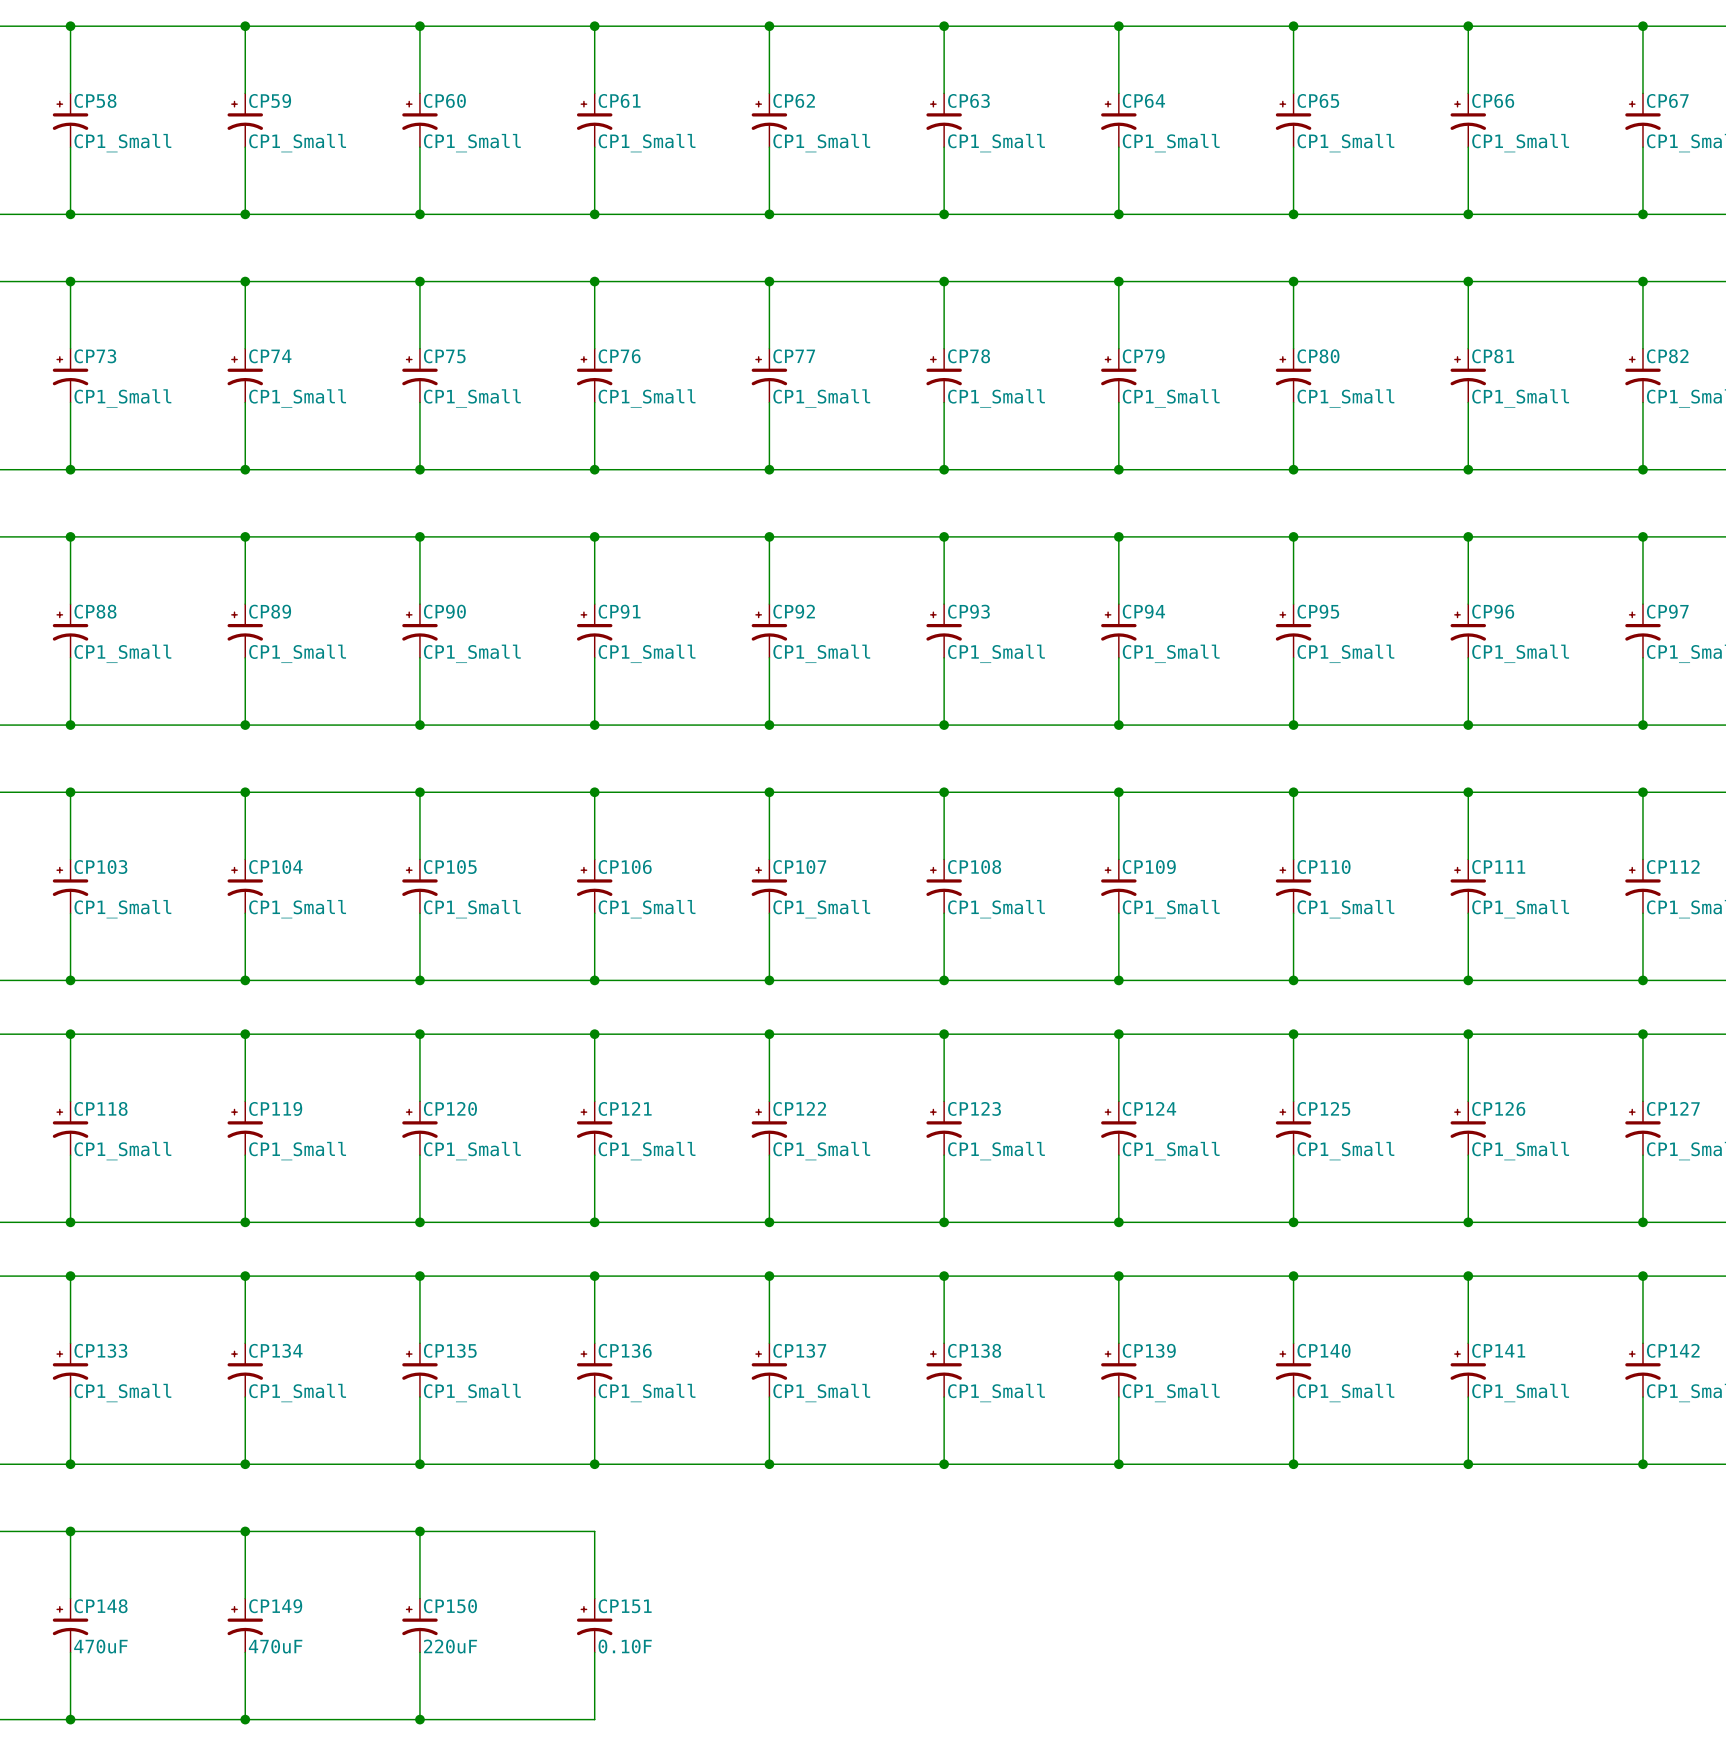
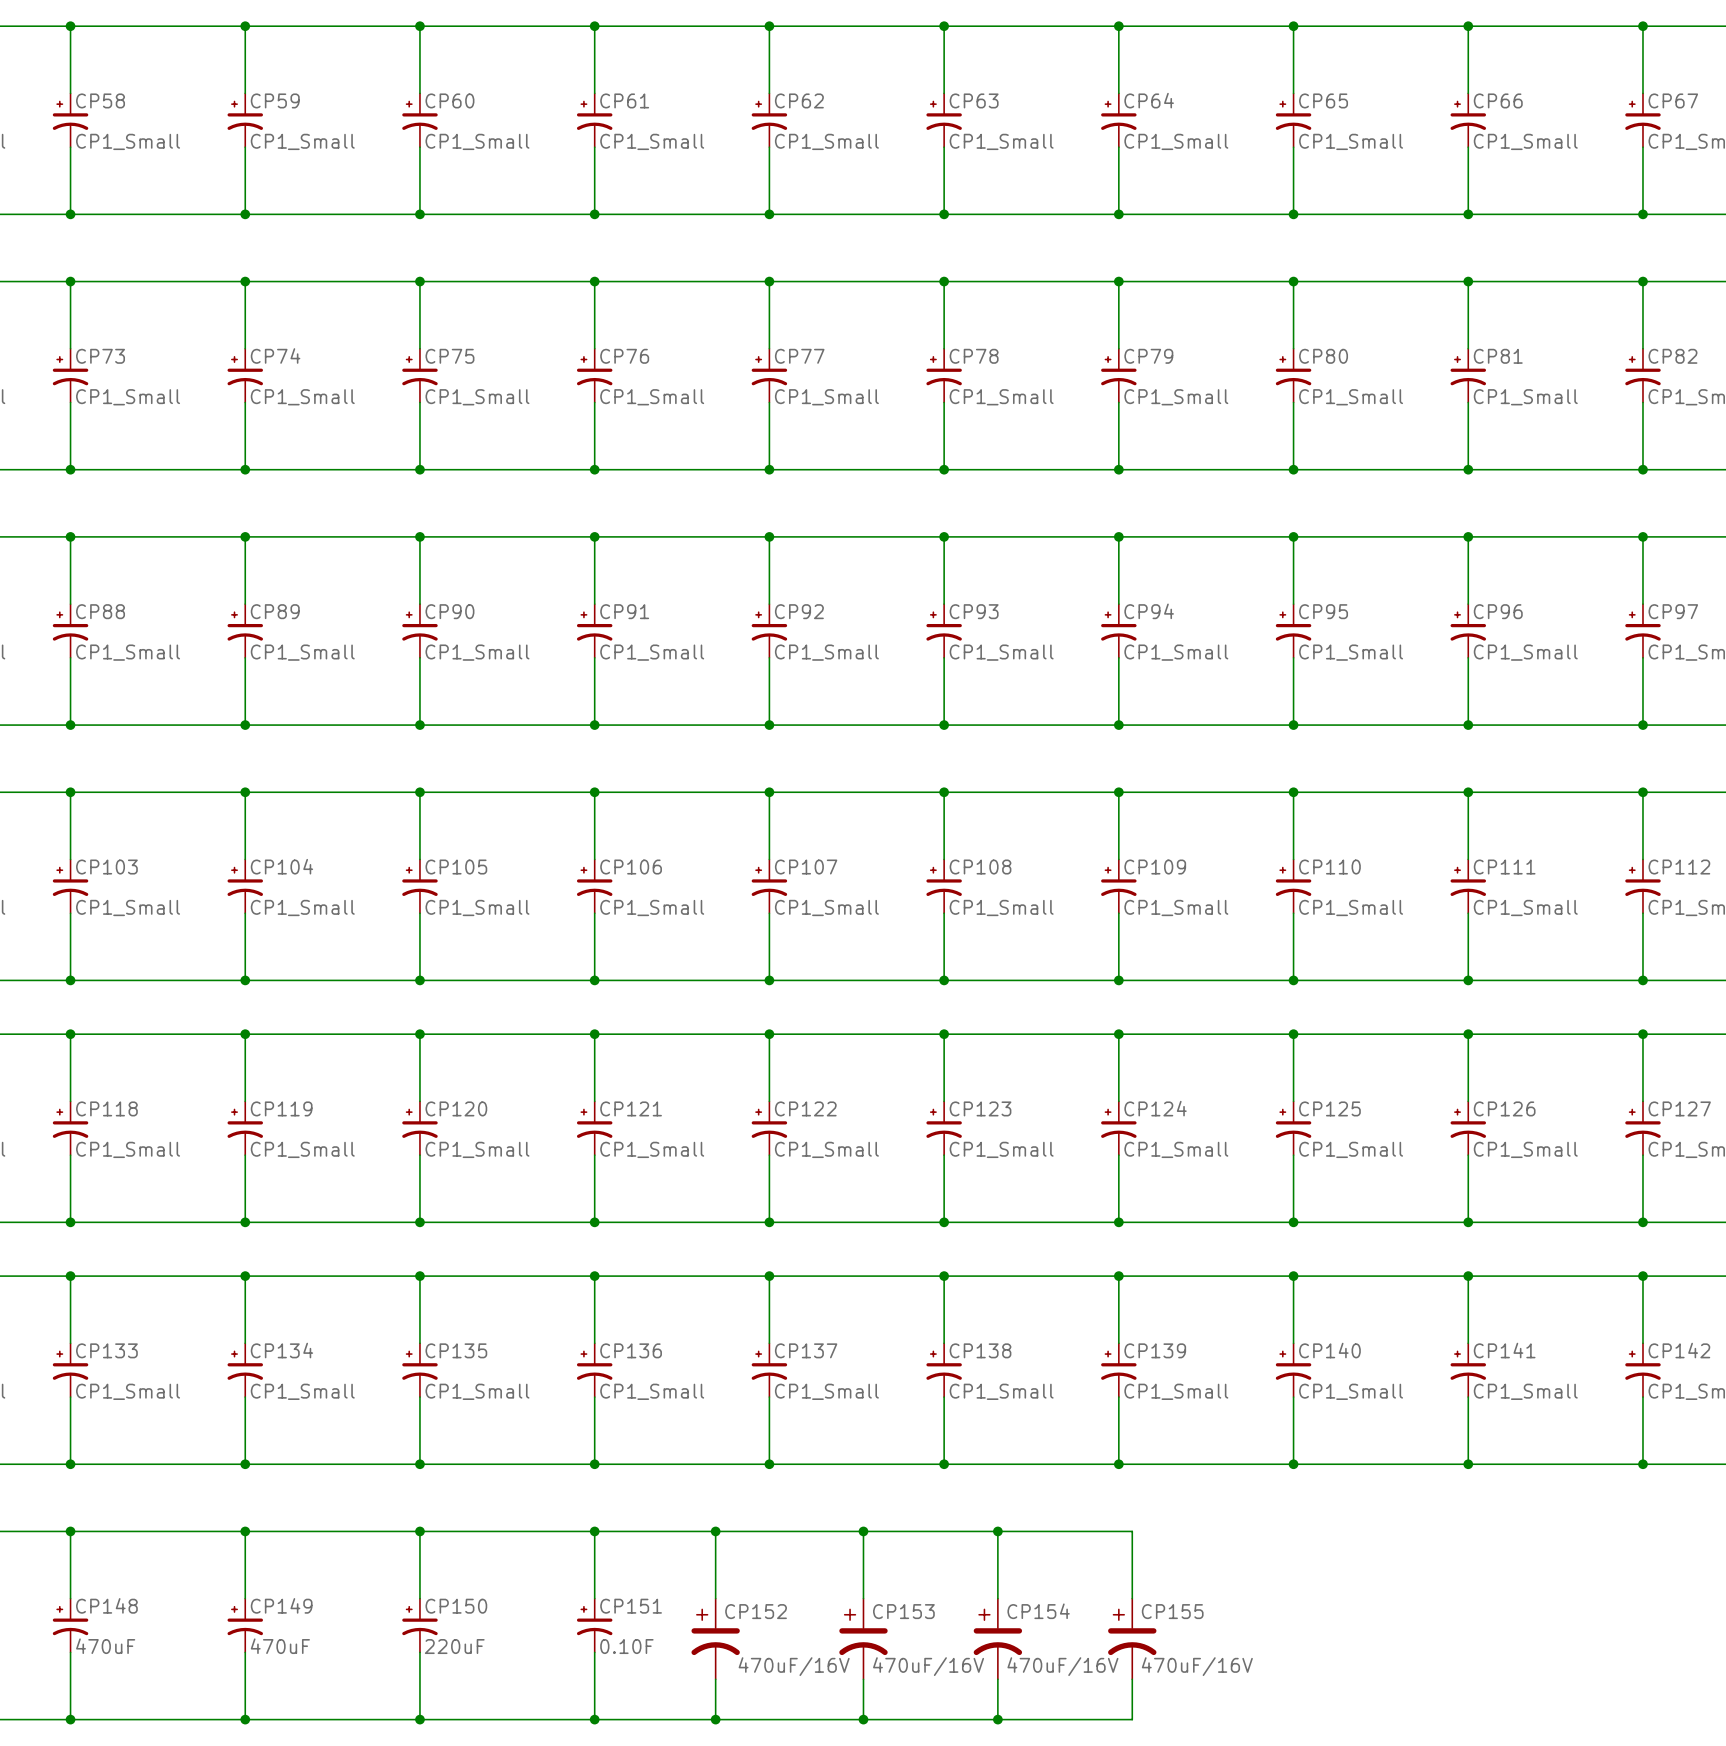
wire: none -> (594, 1531) (1132, 1531) (1132, 1598)
junction: none -> (594, 1531)
wire: none -> (715, 1531) (715, 1598)
junction: none -> (715, 1531)
wire: none -> (863, 1531) (863, 1598)
junction: none -> (863, 1531)
wire: none -> (997, 1531) (997, 1598)
junction: none -> (997, 1531)
CP152: none -> 470uF/16V (715, 1638)
CP153: none -> 470uF/16V (863, 1638)
CP154: none -> 470uF/16V (997, 1638)
CP155: none -> 470uF/16V (1132, 1638)
wire: none -> (715, 1679) (715, 1719)
wire: none -> (863, 1679) (863, 1719)
wire: none -> (997, 1679) (997, 1719)
wire: none -> (1132, 1679) (1132, 1719) (594, 1719)
junction: none -> (594, 1719)
junction: none -> (715, 1719)
junction: none -> (863, 1719)
junction: none -> (997, 1719)

